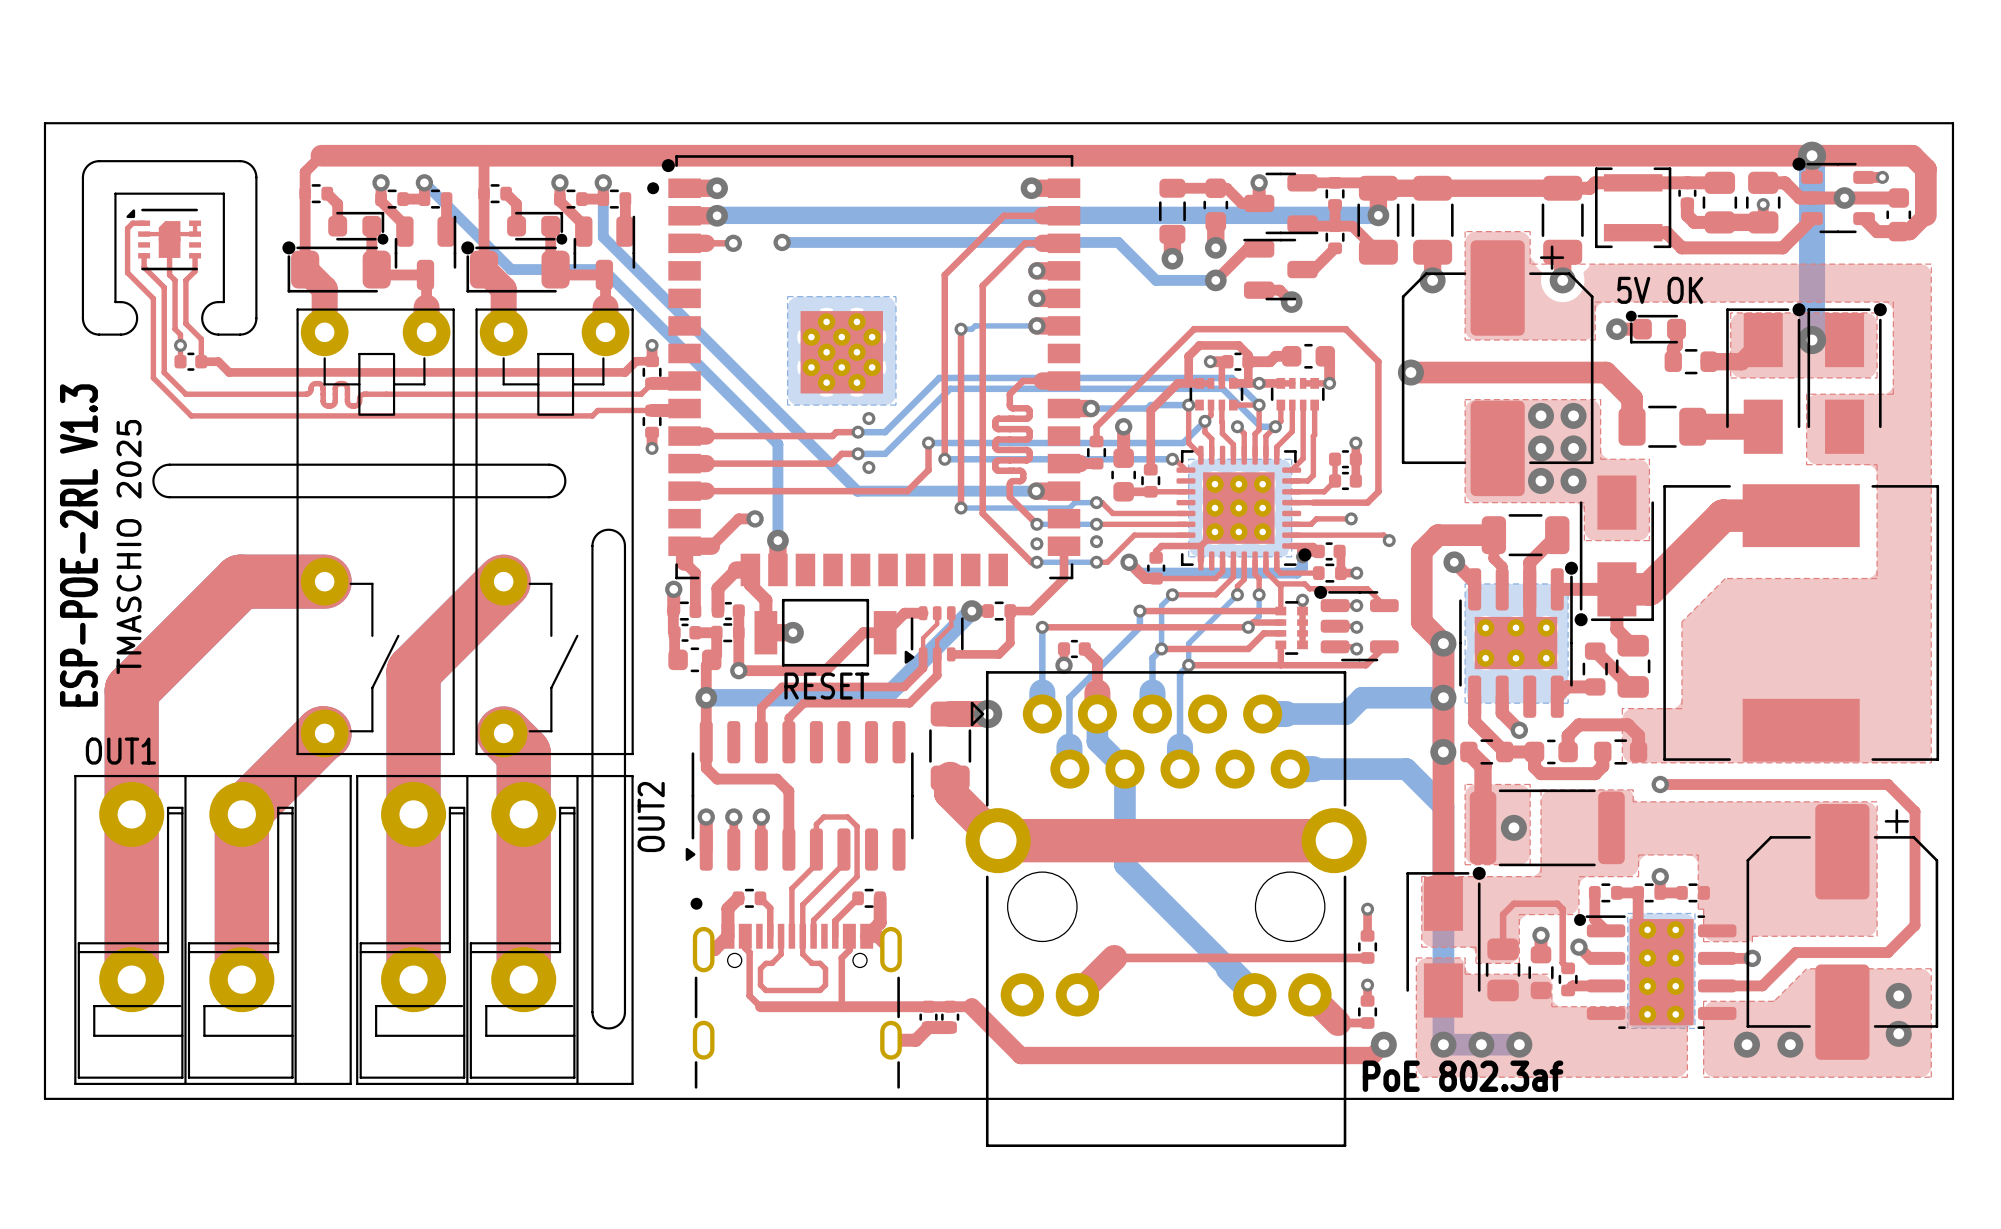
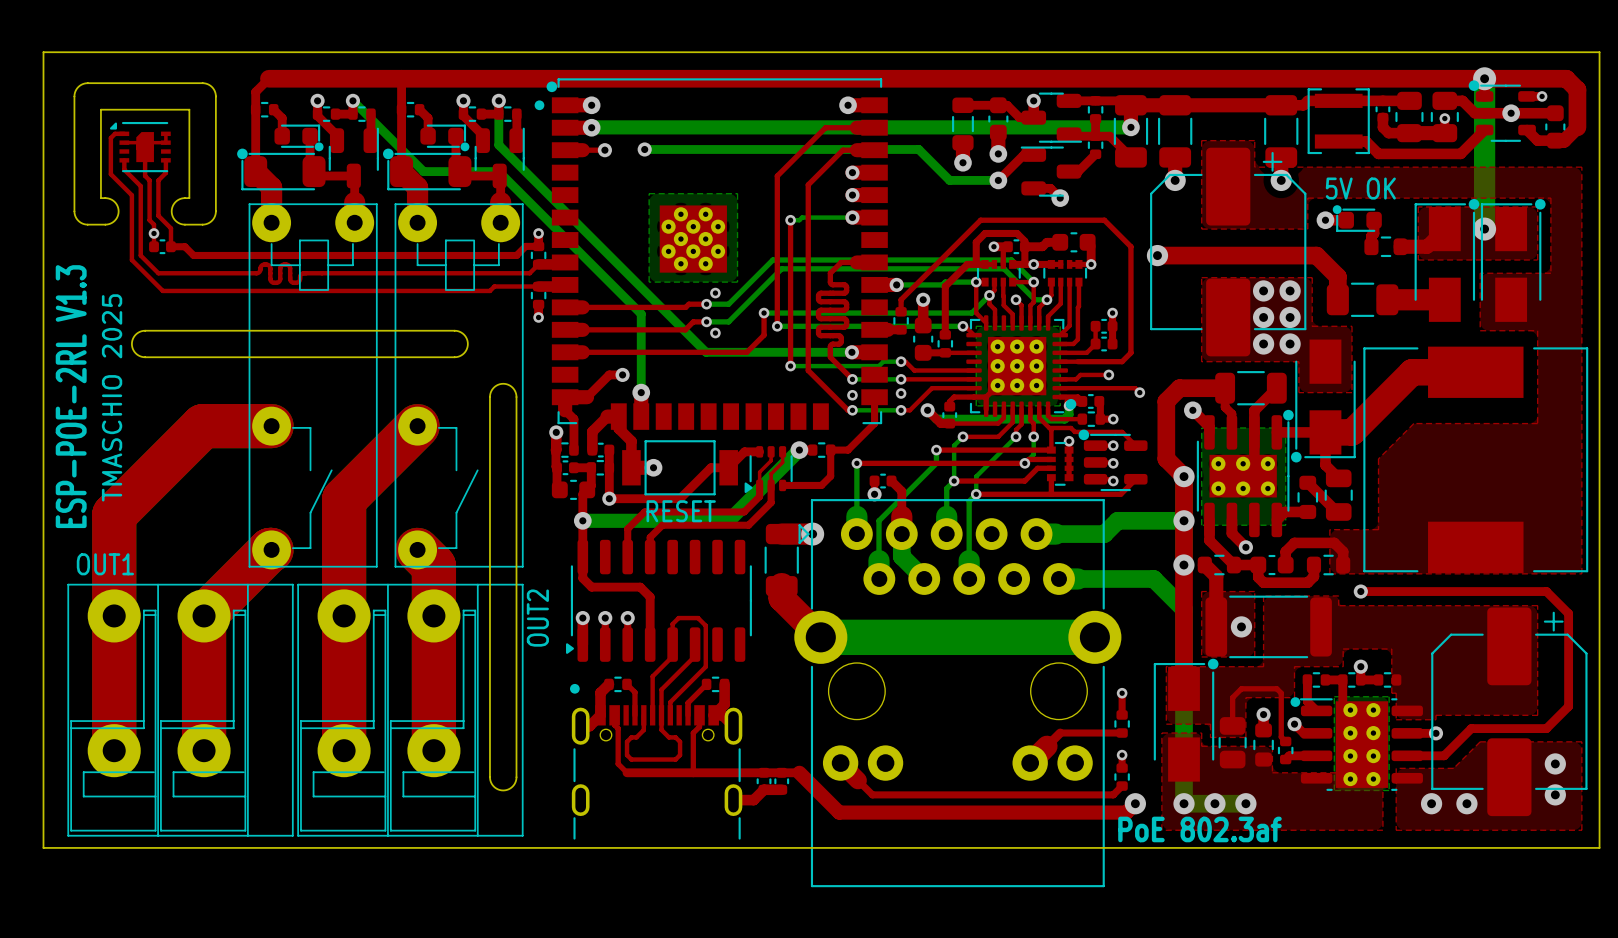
bottom track: (1124, 769) (1124, 864) (1254, 994) -> none
top track: (998, 840) (1334, 840) -> none
bottom track: none -> (820, 637) (1094, 637)
top track: (1291, 957) (1114, 957) (1077, 994) -> (1060, 733) (1030, 763)
top track: (1309, 994) (1338, 1022) (1367, 1022) -> (840, 763) (872, 794) (1113, 794) (1122, 786)

